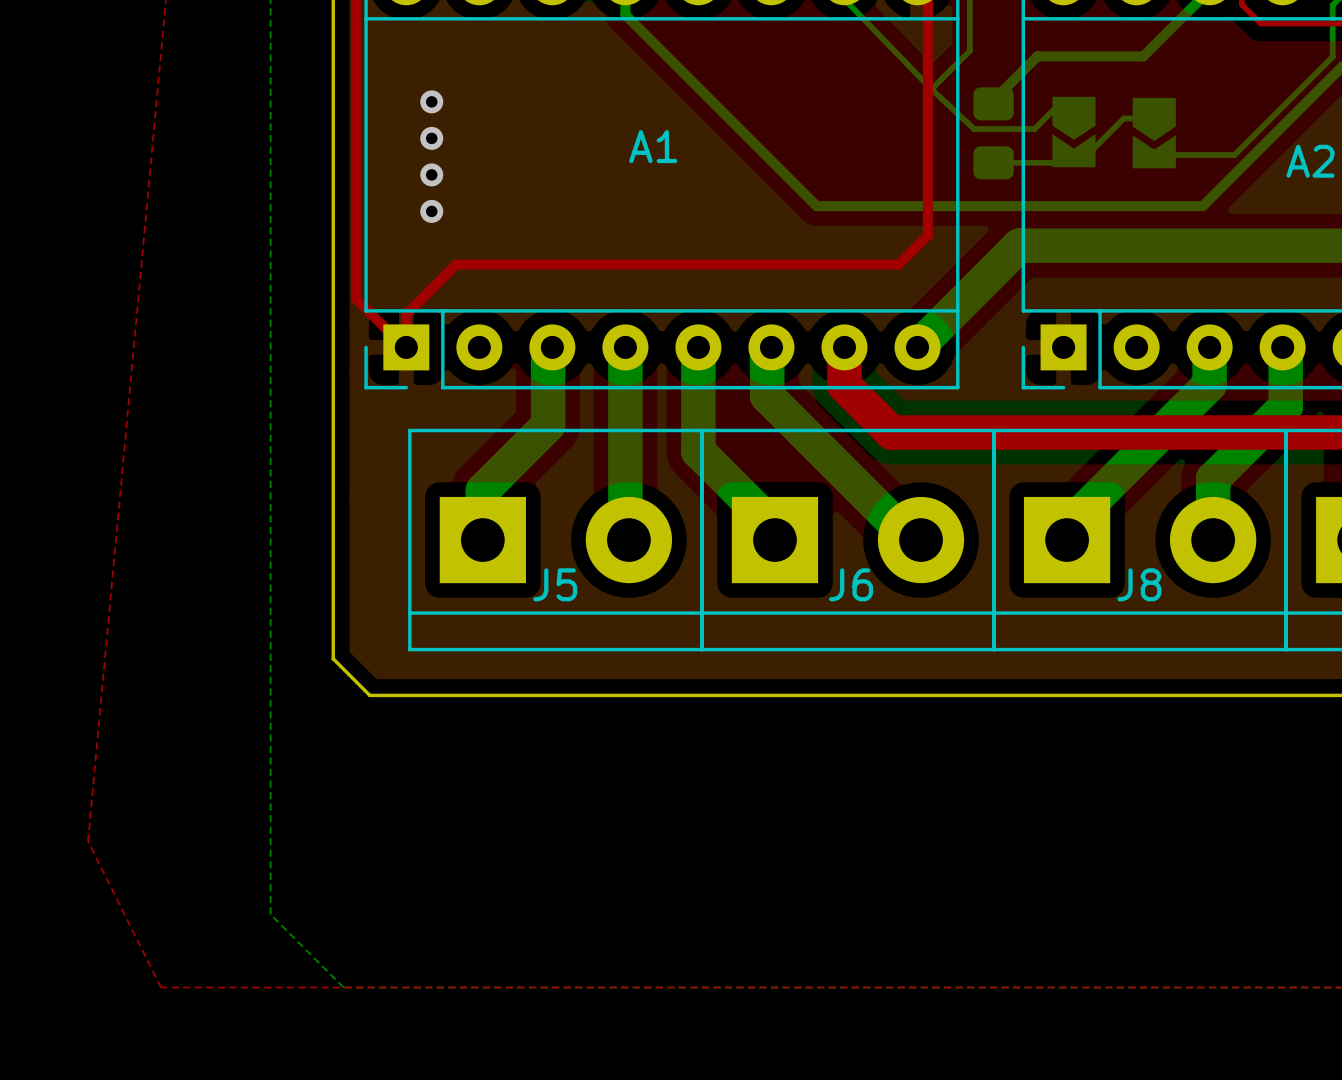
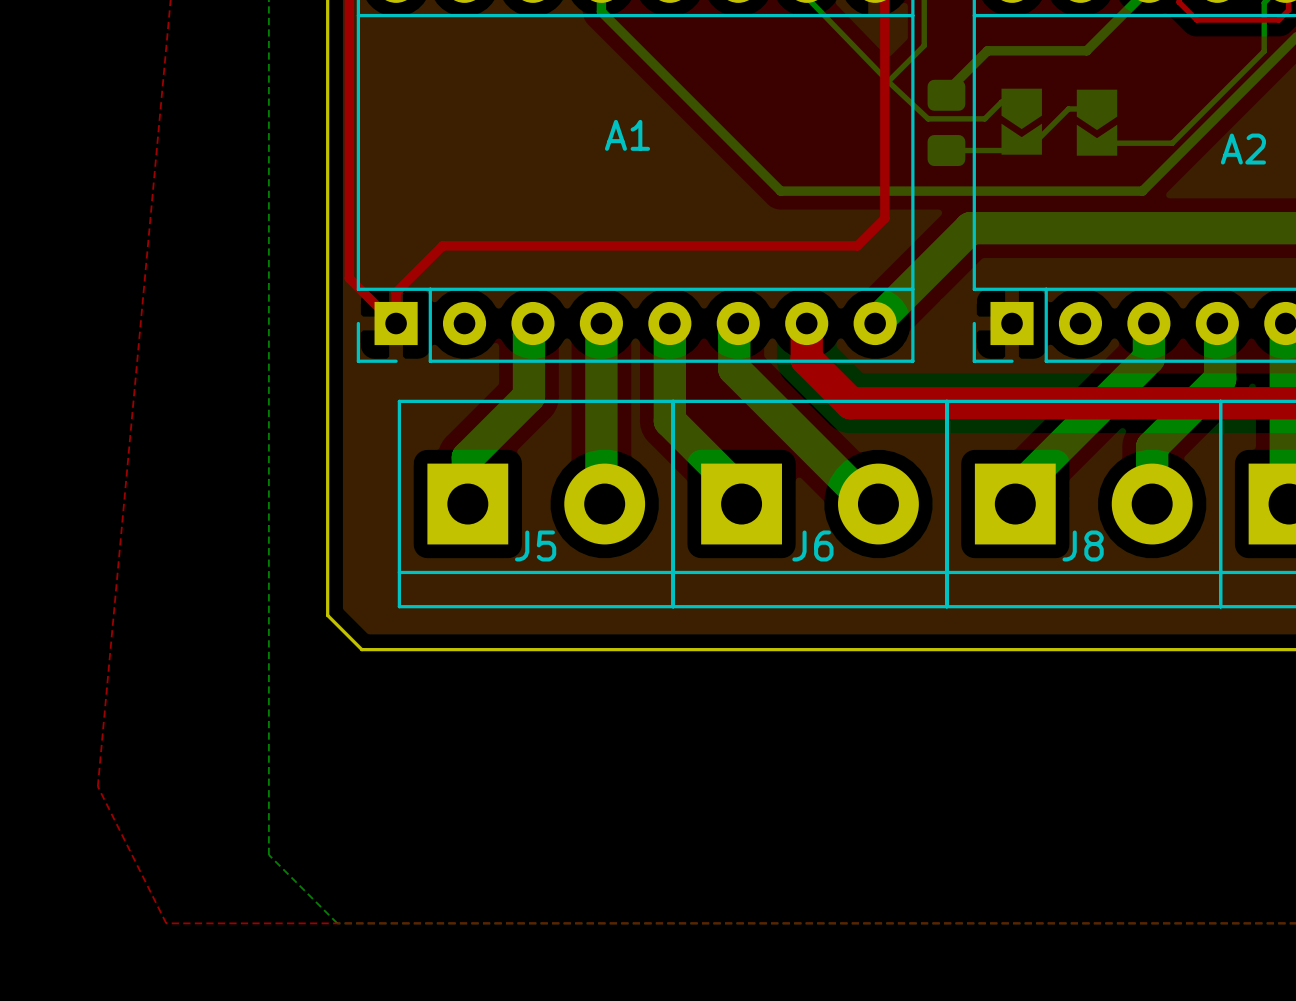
via: (431, 101) -> none
via: (431, 138) -> none
via: (431, 174) -> none
via: (431, 211) -> none

